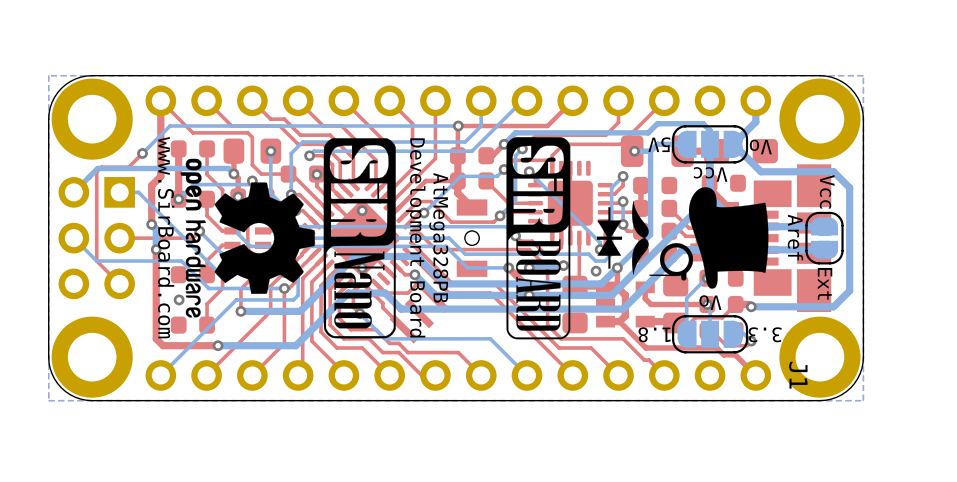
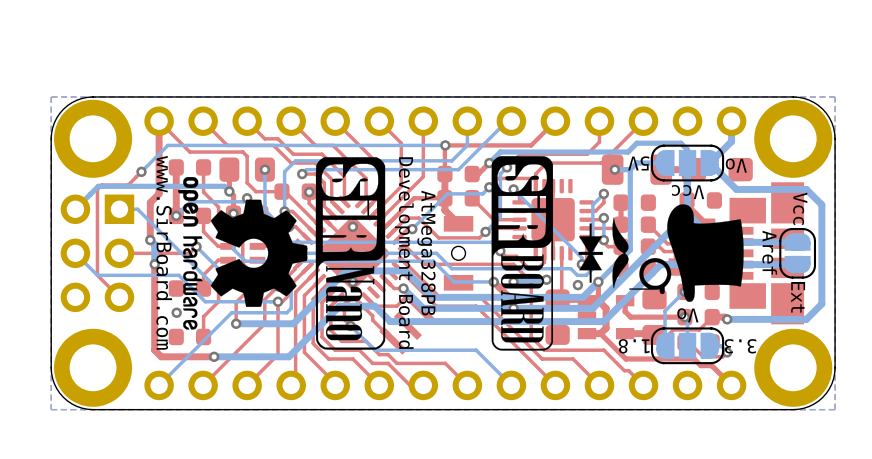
J1 name: J1 (798, 375) -> none

